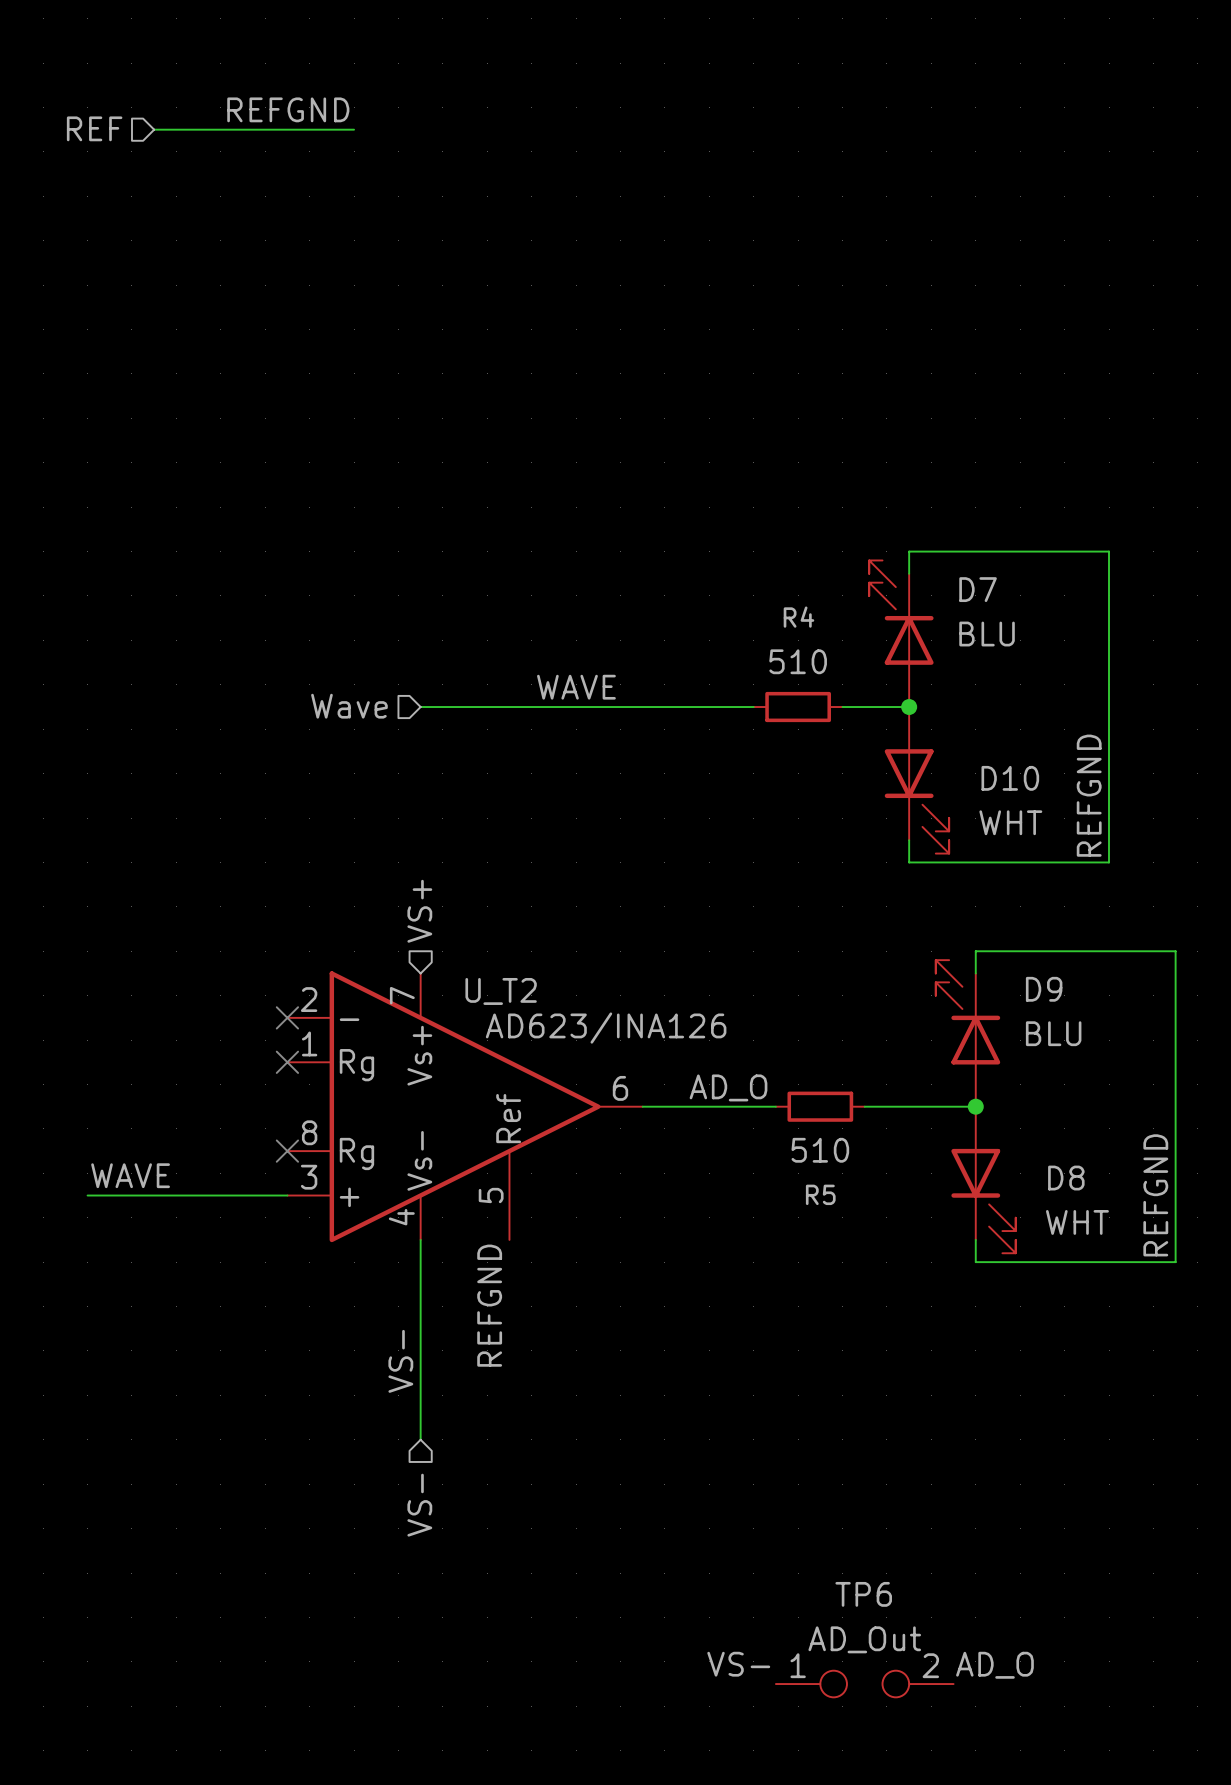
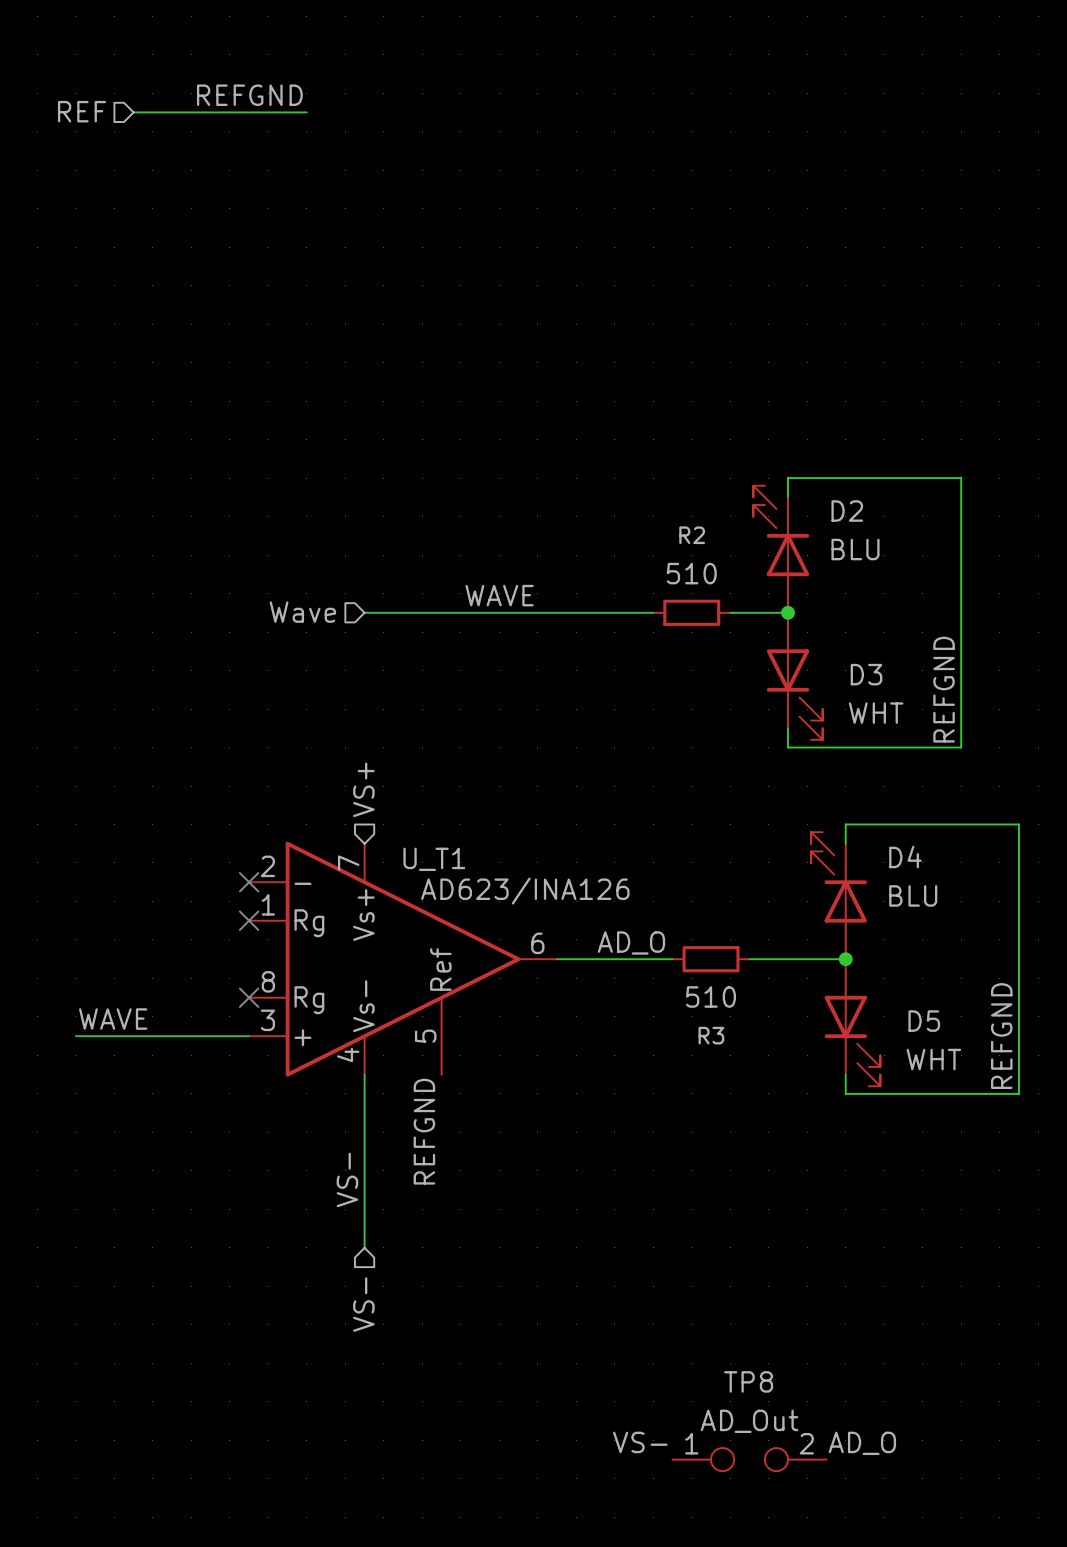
D7 name: D7 (978, 589) -> D2 (847, 511)
R4 name: R4 (798, 617) -> R2 (692, 535)
D10 name: D10 (1010, 778) -> D3 (866, 674)
D9 name: D9 (1044, 989) -> D4 (905, 857)
U_T2 name: U_T2 (501, 991) -> U_T1 (434, 859)
D8 name: D8 (1066, 1178) -> D5 (924, 1021)
R5 name: R5 (820, 1194) -> R3 (711, 1035)
TP6 name: TP6 (863, 1594) -> TP8 (748, 1381)

